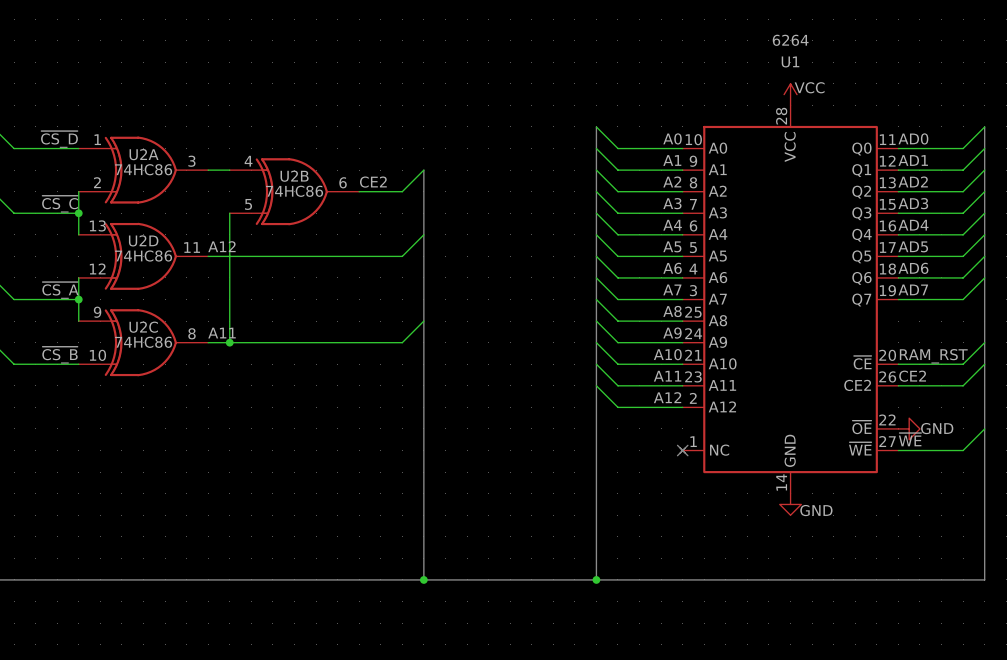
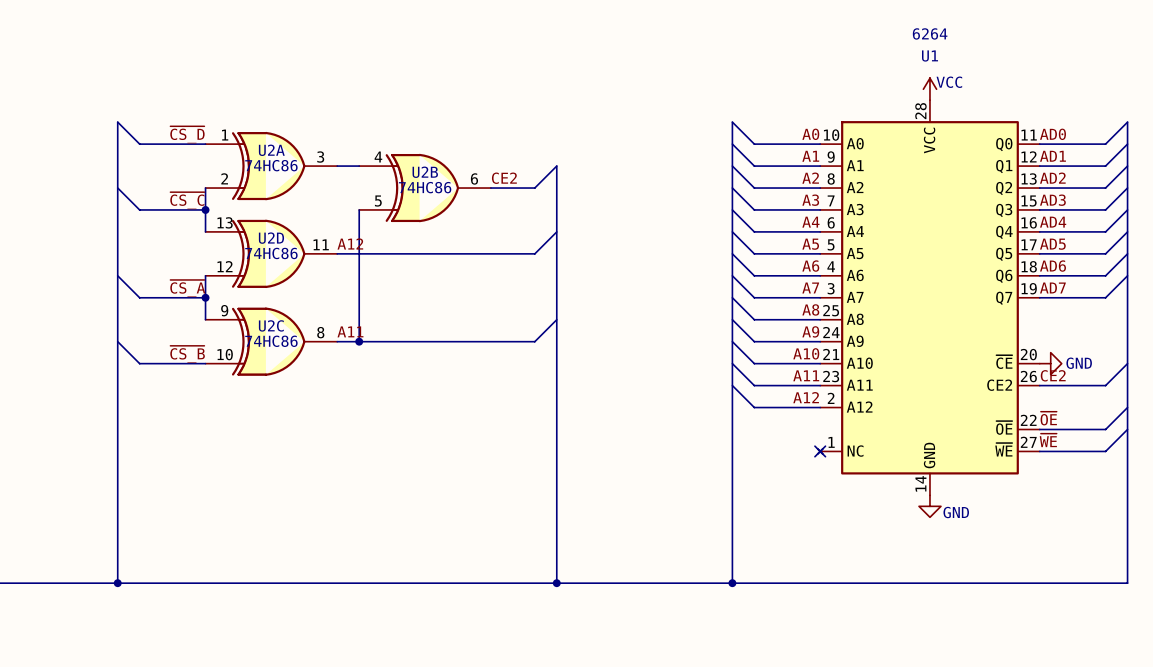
wire: (984, 342) (963, 364) (898, 364) -> (1127, 407) (1105, 429) (1039, 429)
label: RAM_RST (933, 356) -> none
label: none -> ~{OE} (1048, 418)
power symbol position: GND (909, 428) -> GND (1050, 363)

